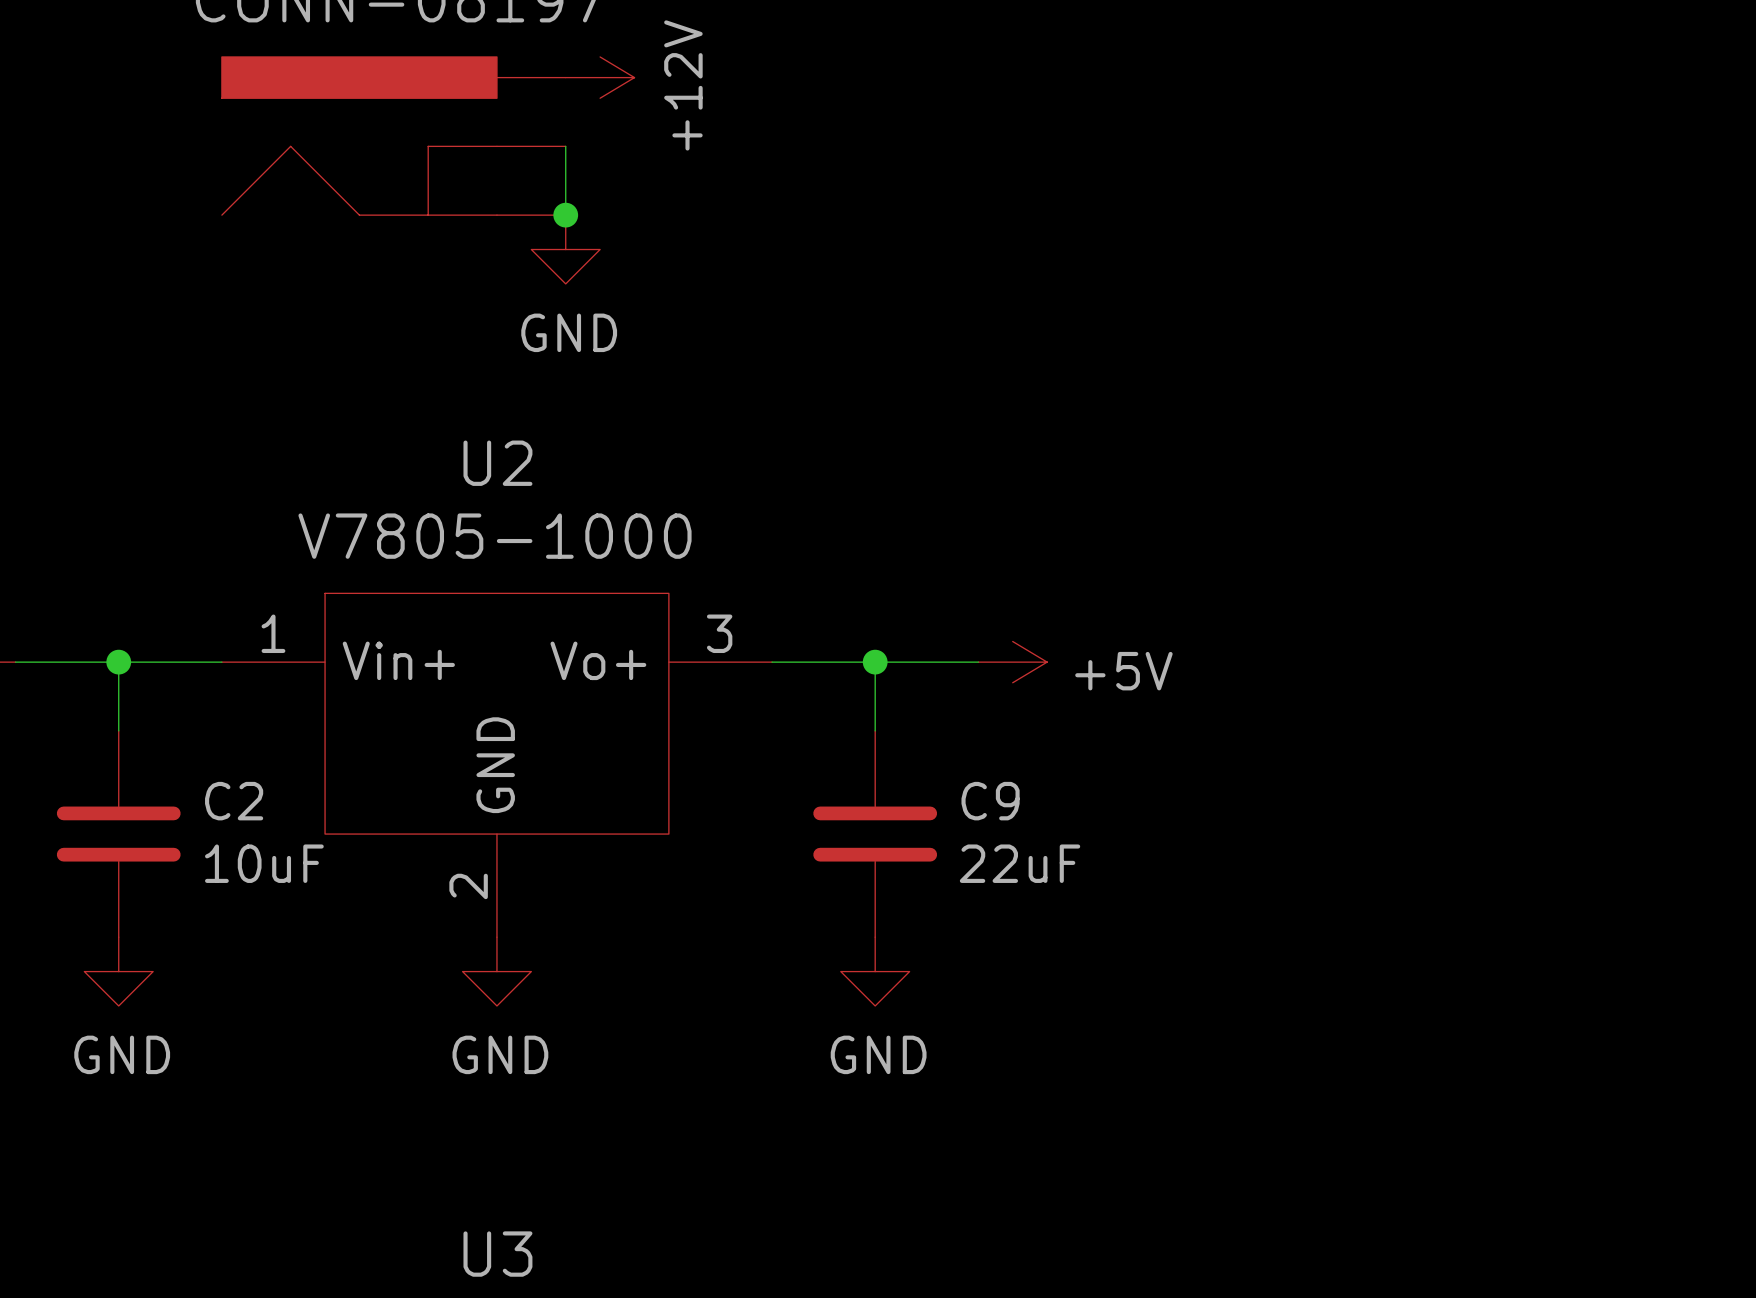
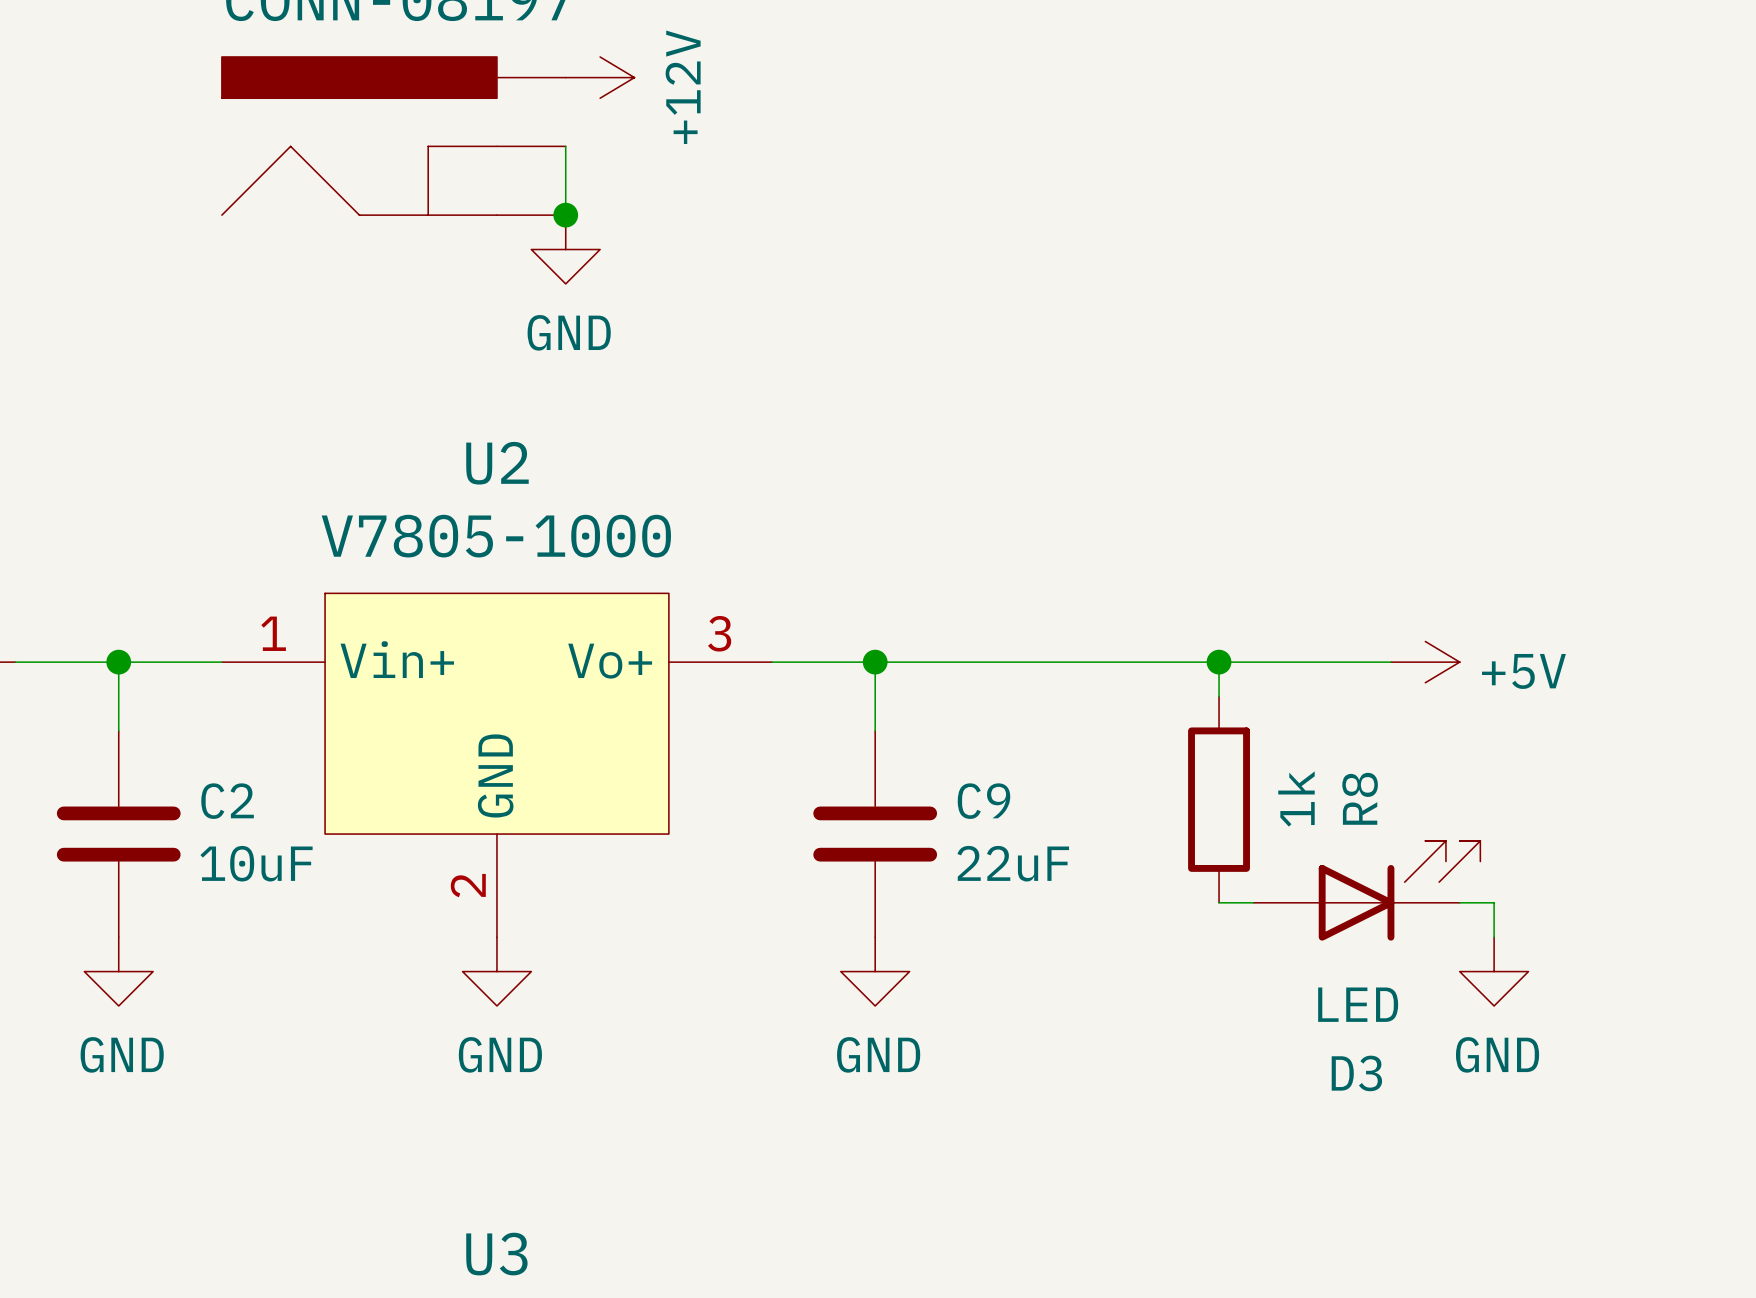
wire: none -> (978, 662) (1390, 662)
power symbol position: +5V (1012, 662) -> +5V (1425, 662)
wire: none -> (1219, 662) (1219, 696)
junction: none -> (1219, 662)
R8: none -> 1k (1219, 799)
D3: none -> LED (1366, 890)
wire: none -> (1219, 902) (1253, 902)
wire: none -> (1459, 902) (1494, 902) (1494, 937)
power symbol: none -> GND (1494, 971)

